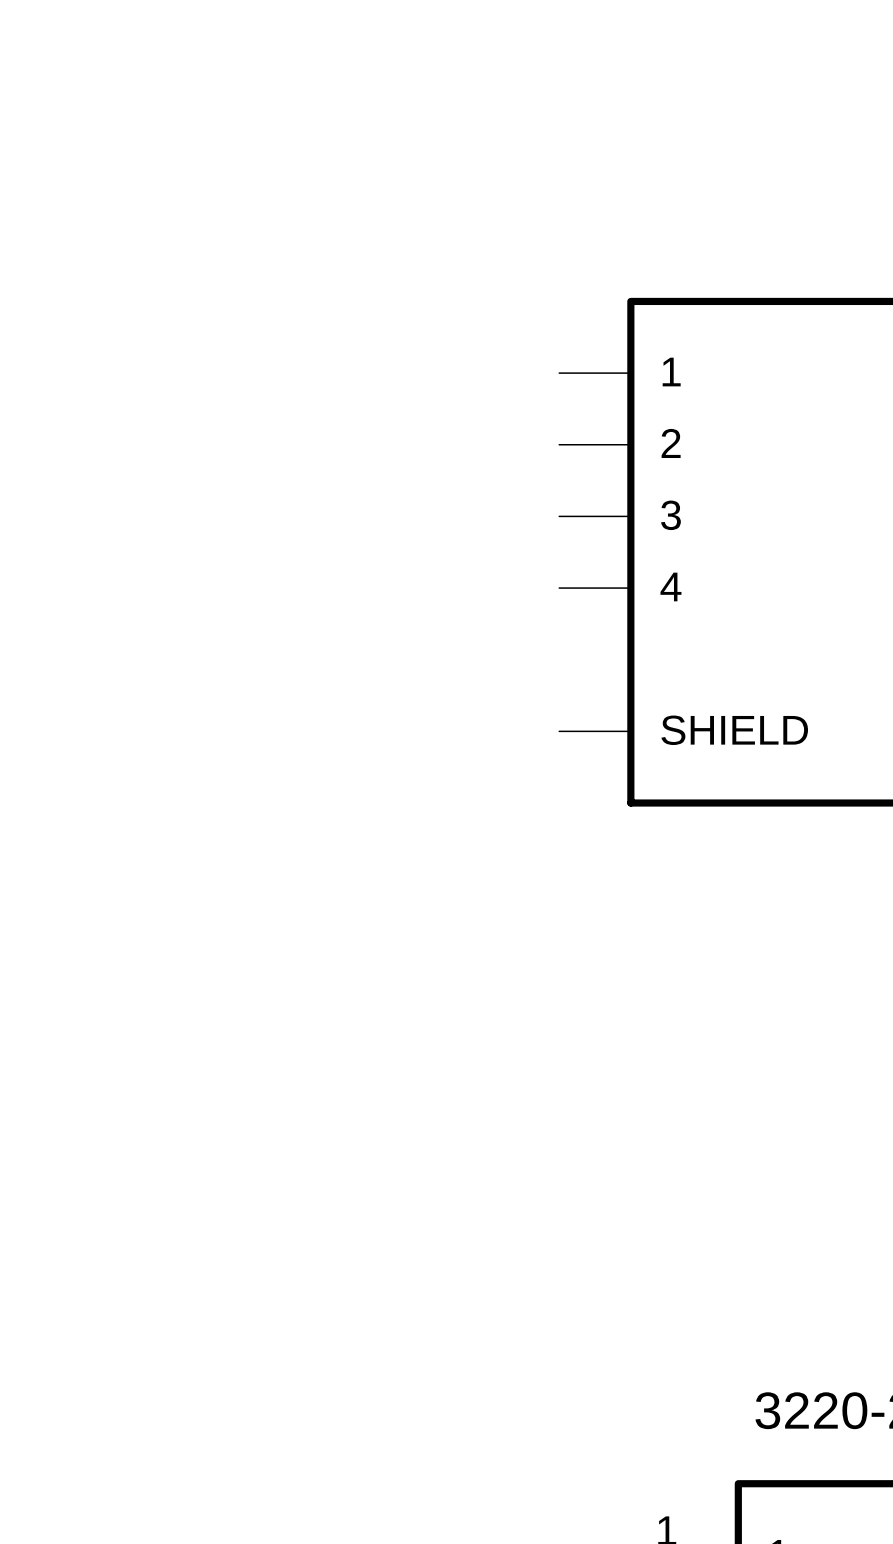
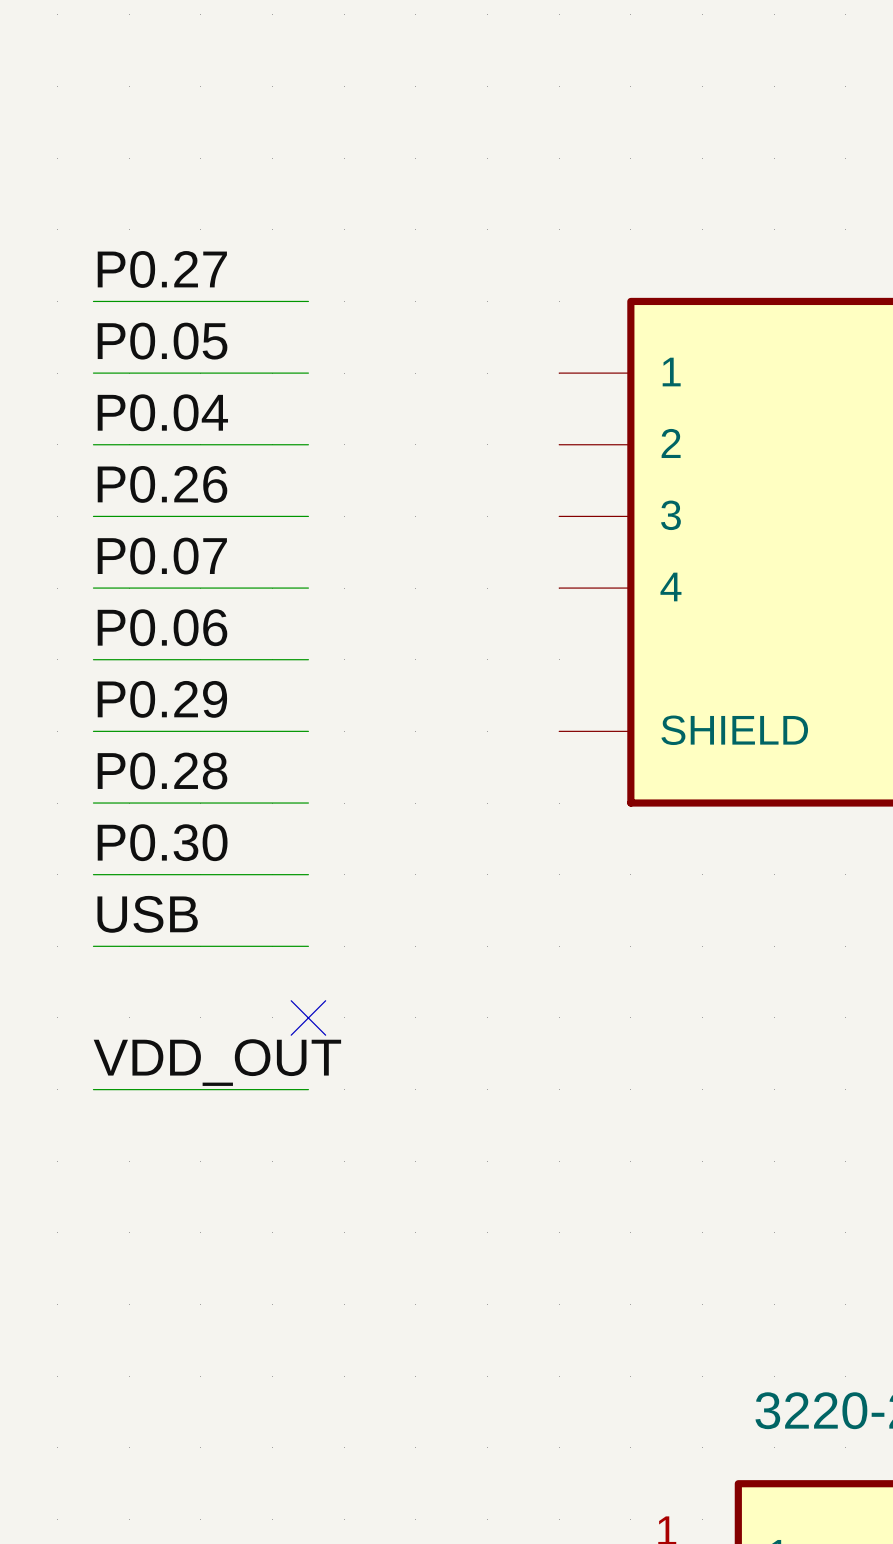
label: none -> P0.27 (162, 269)
wire: none -> (93, 301) (308, 301)
label: none -> P0.05 (162, 341)
wire: none -> (93, 373) (308, 373)
label: none -> P0.04 (162, 412)
wire: none -> (93, 444) (308, 444)
label: none -> P0.26 (162, 484)
wire: none -> (93, 516) (308, 516)
label: none -> P0.07 (162, 556)
wire: none -> (93, 588) (308, 588)
label: none -> P0.06 (162, 627)
wire: none -> (93, 659) (308, 659)
label: none -> P0.29 (162, 699)
wire: none -> (93, 731) (308, 731)
label: none -> P0.28 (162, 771)
wire: none -> (93, 803) (308, 803)
label: none -> P0.30 (162, 842)
wire: none -> (93, 874) (308, 874)
label: none -> USB (147, 914)
wire: none -> (93, 946) (308, 946)
no-connect mark: none -> (308, 1017)
label: none -> VDD_OUT (217, 1062)
wire: none -> (93, 1089) (308, 1089)

